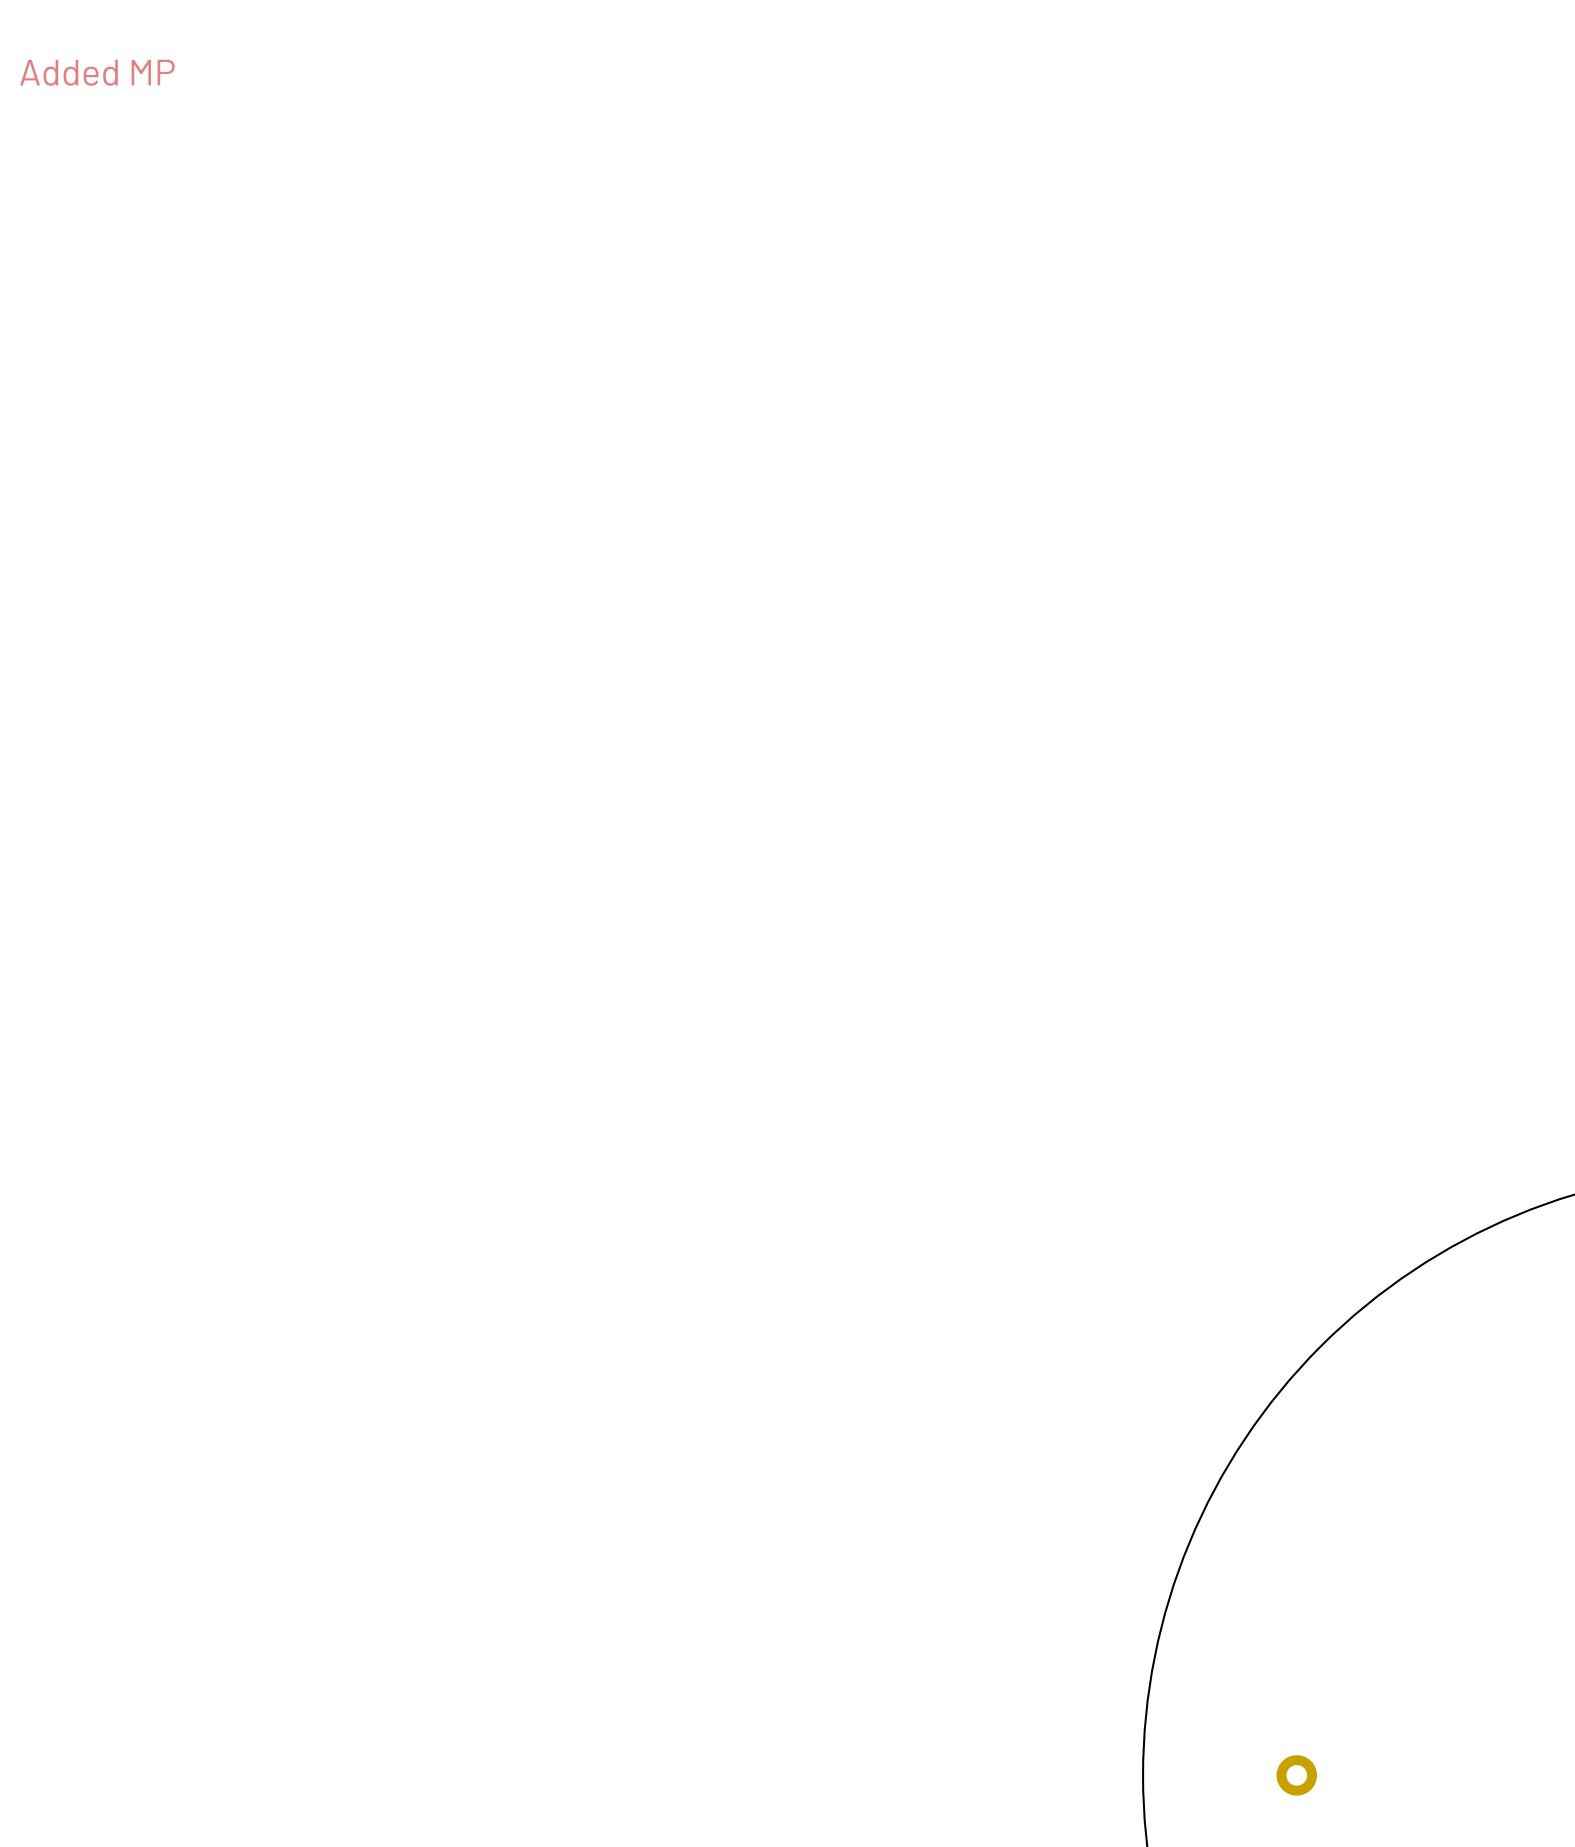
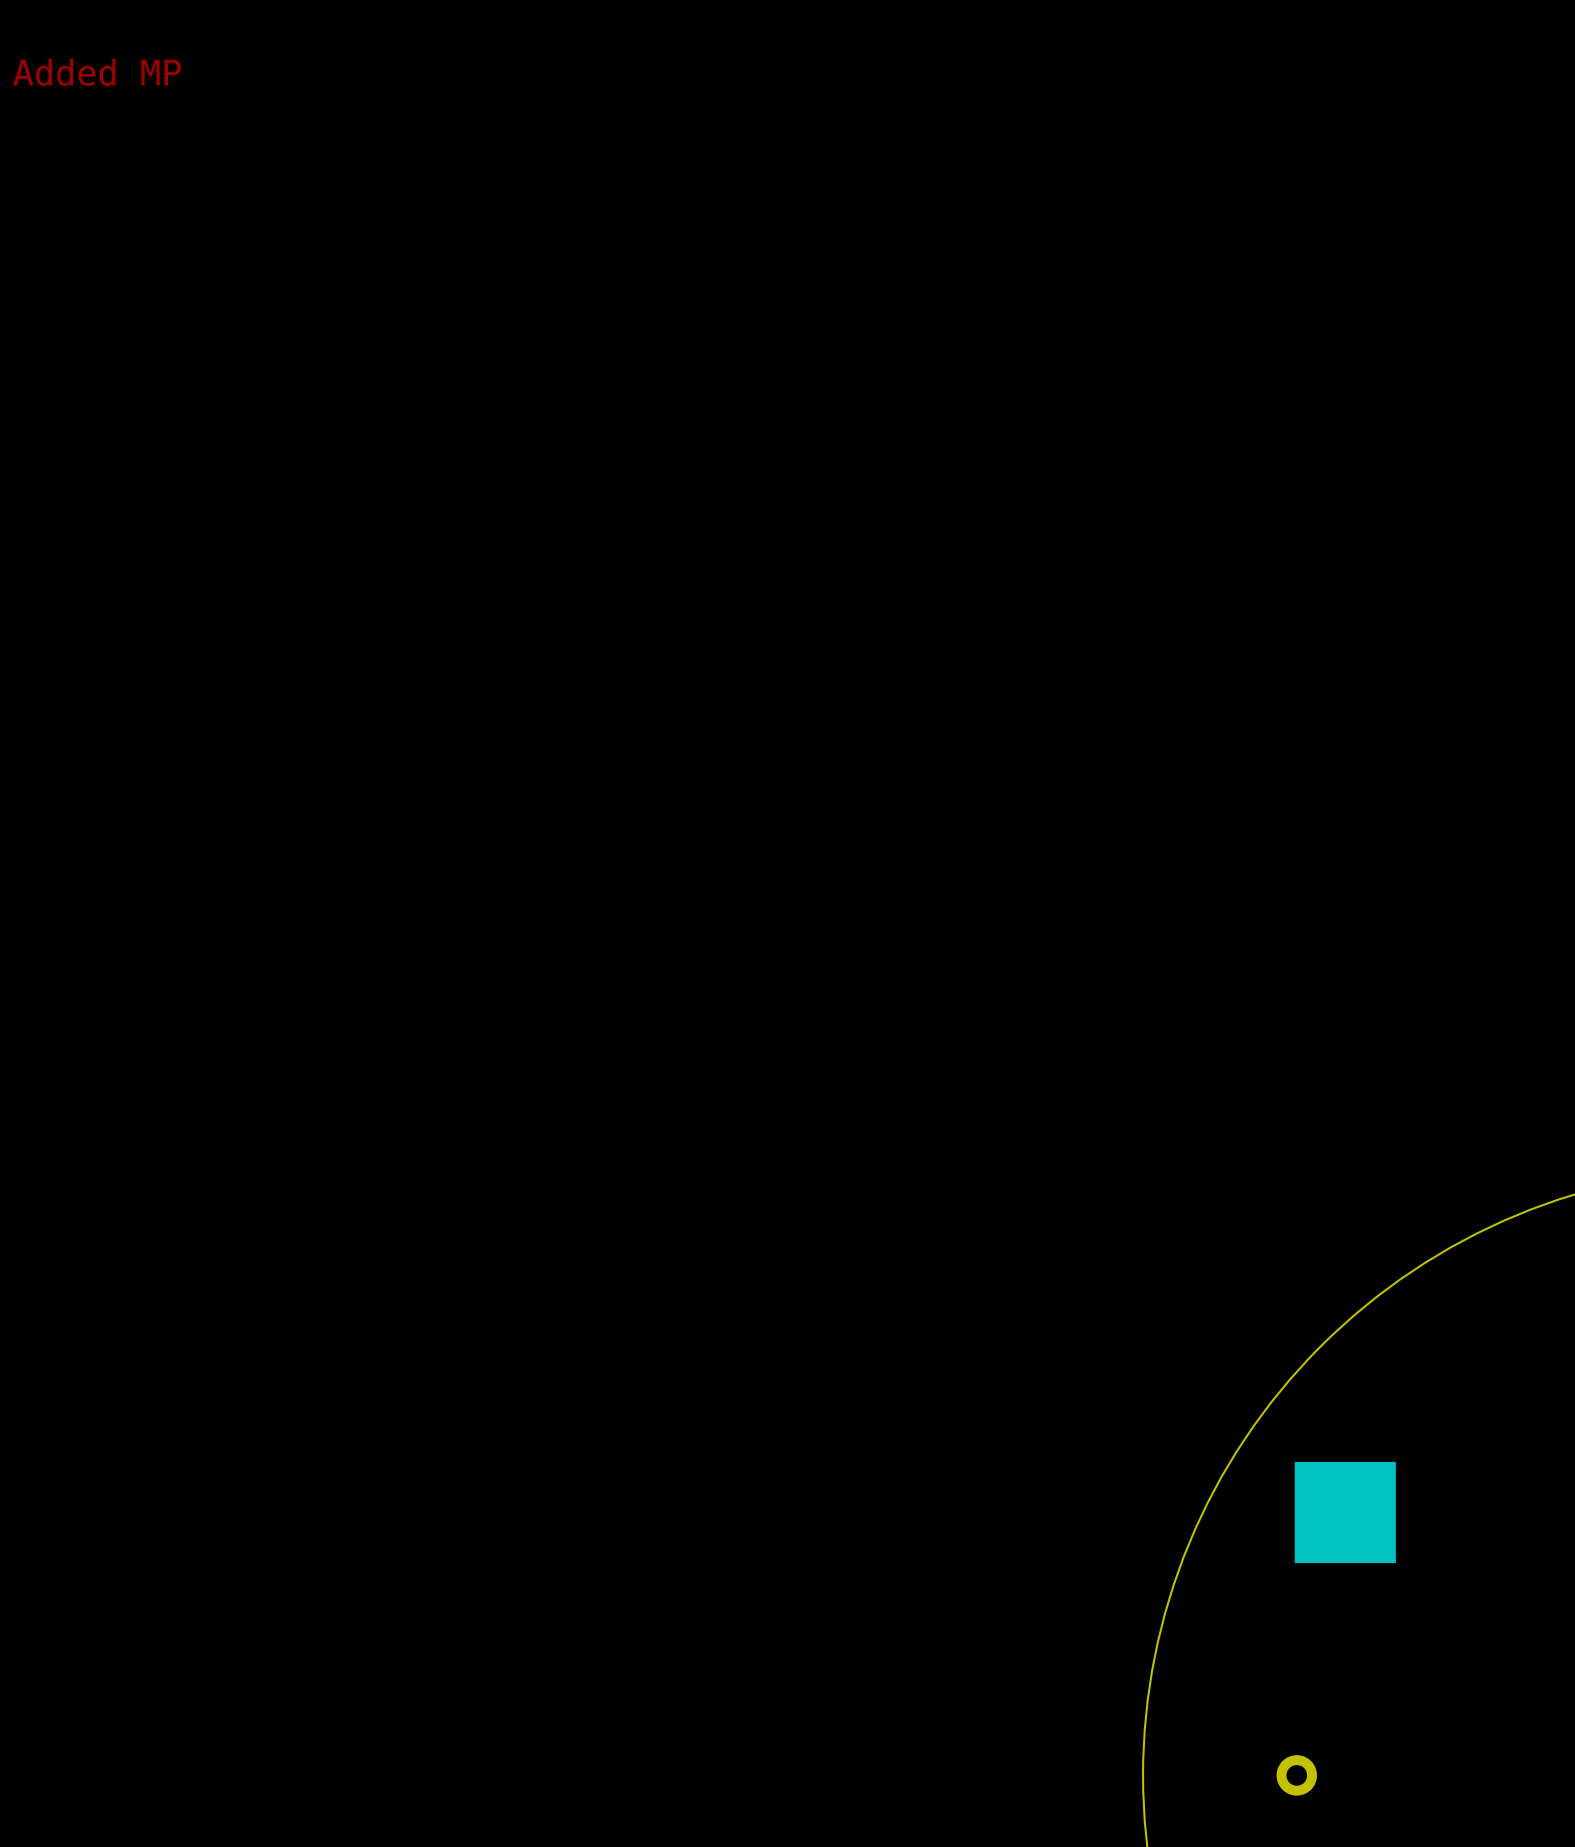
drawing: none -> [1294, 1461, 1396, 1564]

